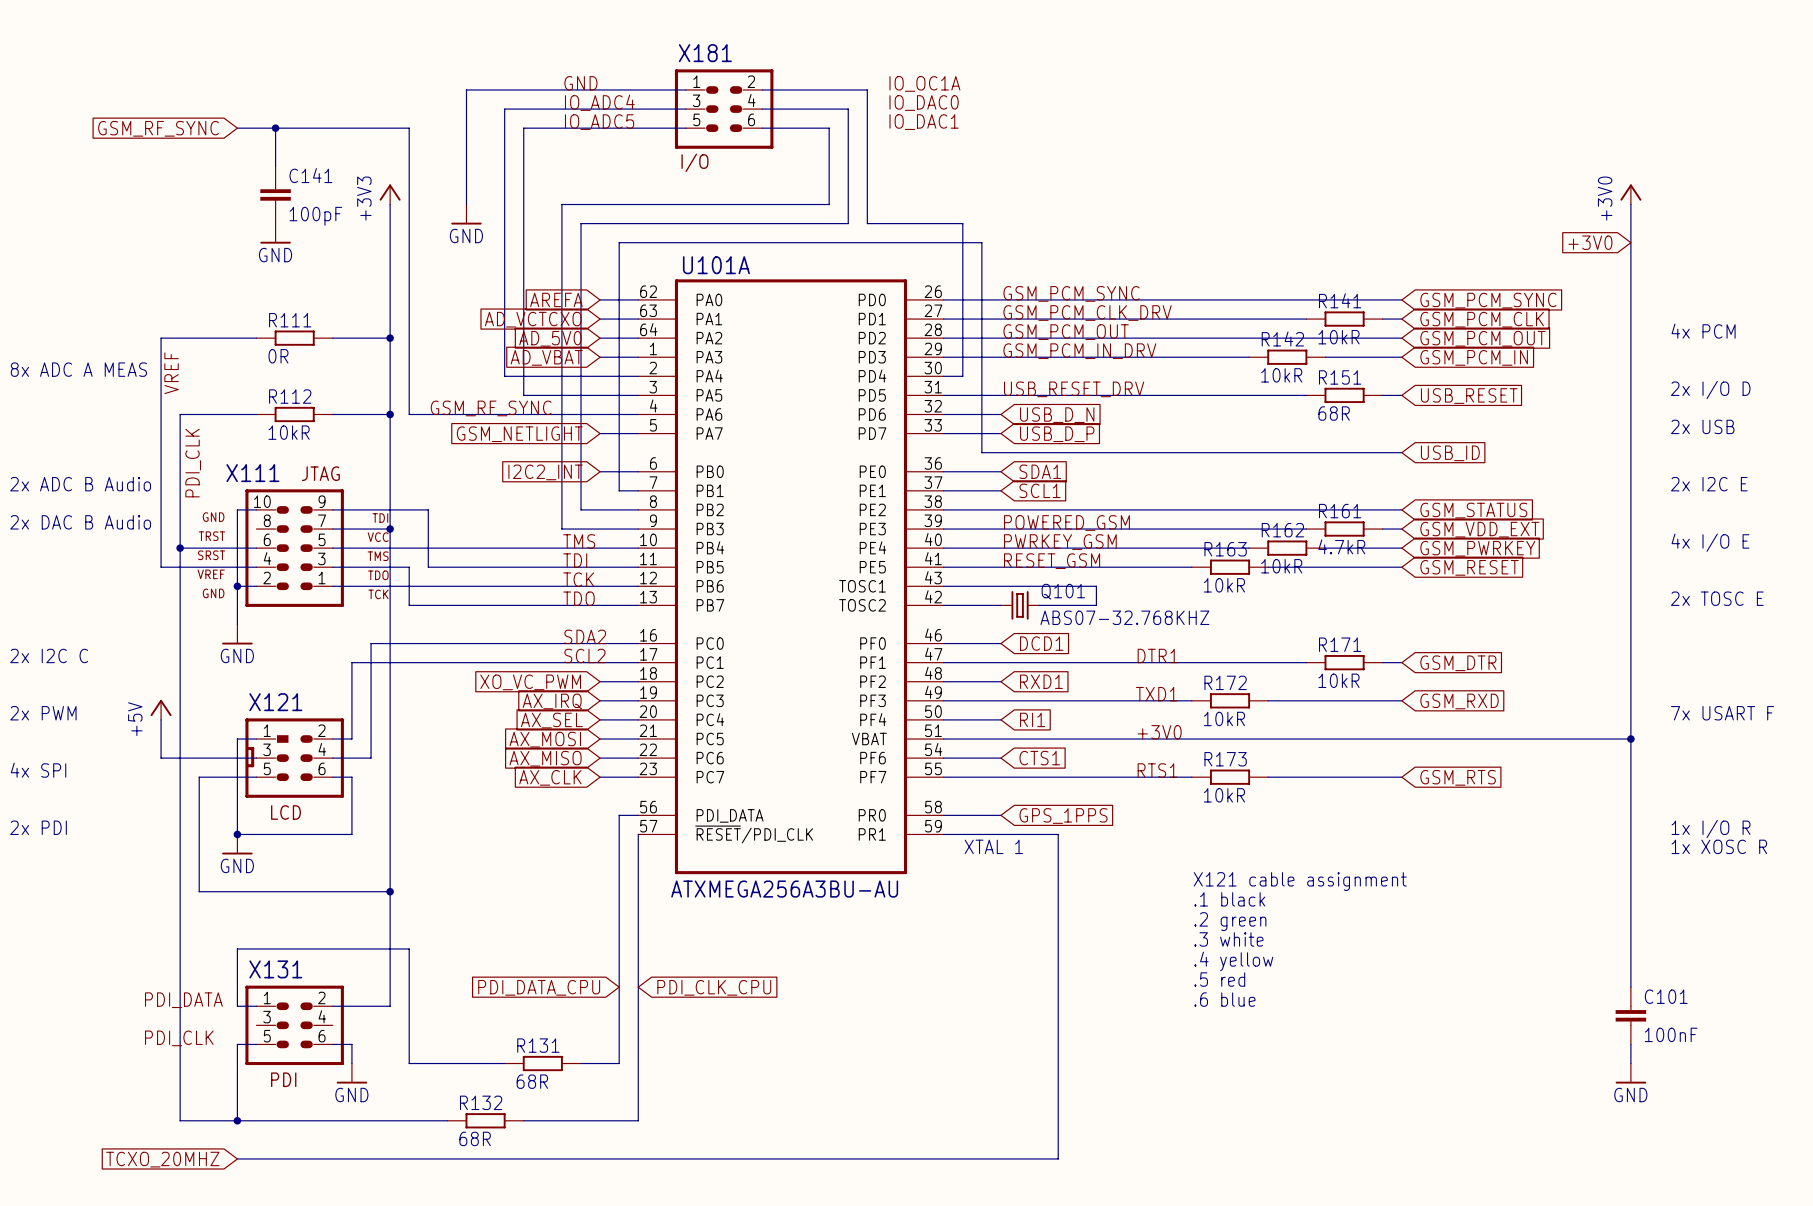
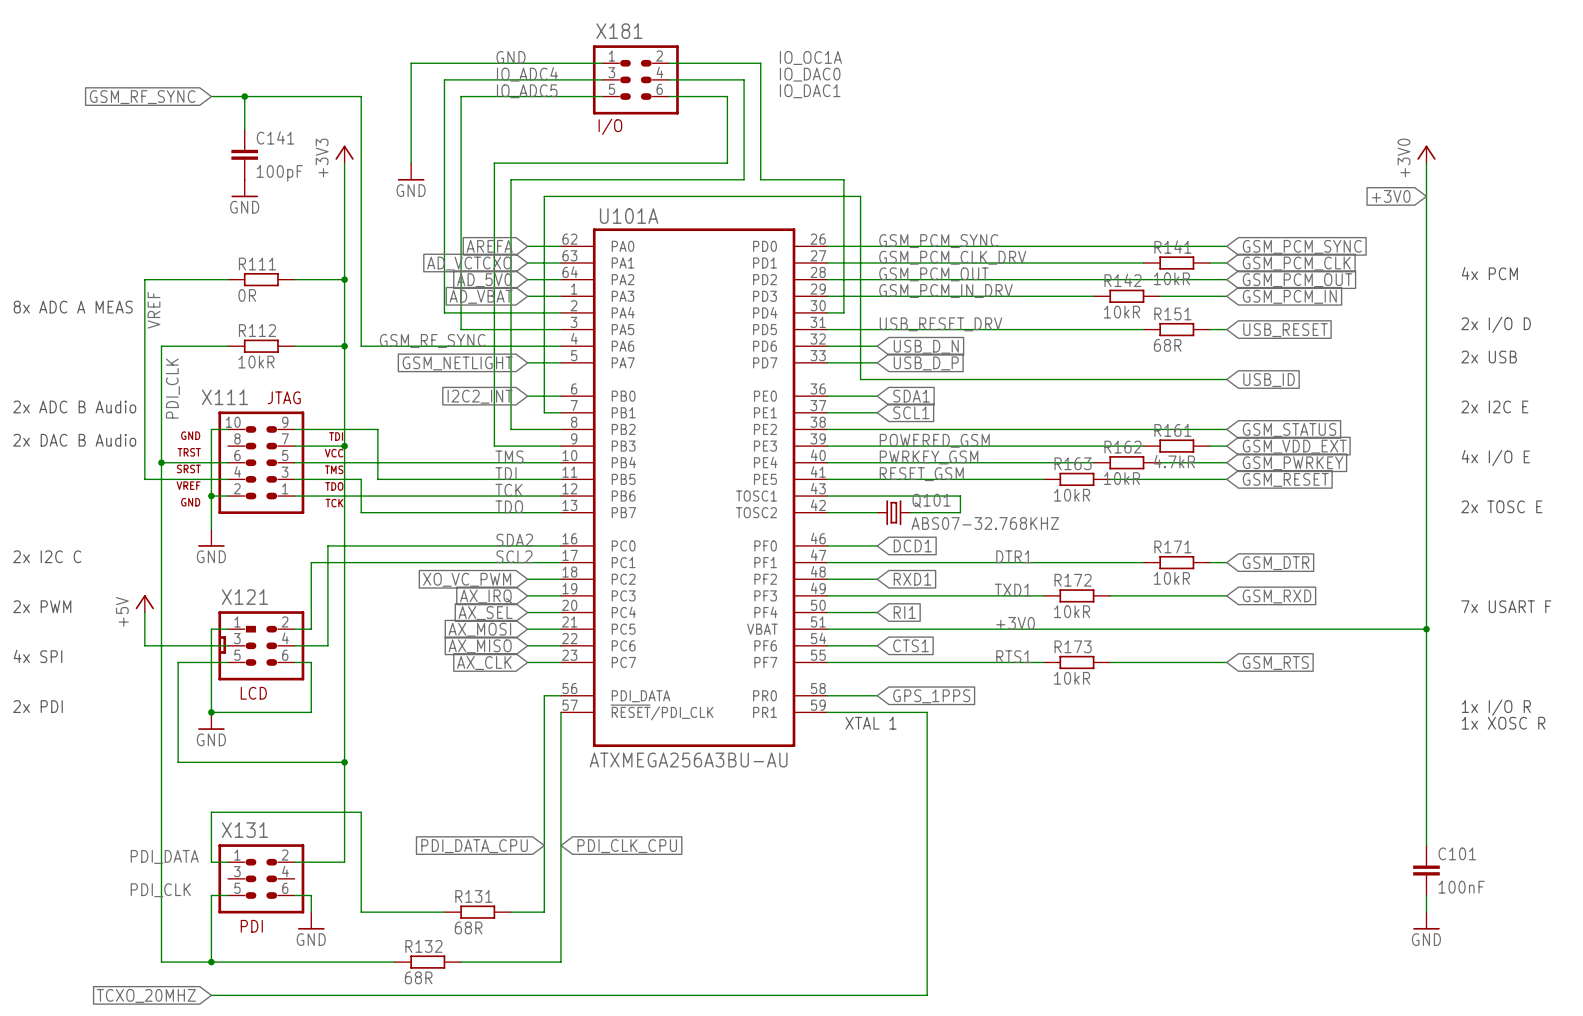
text: X121 cable assignment (1300, 881) -> none
text: .1 black (1229, 899) -> none
text: .2 green (1230, 921) -> none
text: .3 white (1228, 939) -> none
text: .4 yellow (1233, 961) -> none
text: .5 red (1219, 979) -> none
text: .6 blue (1224, 999) -> none

